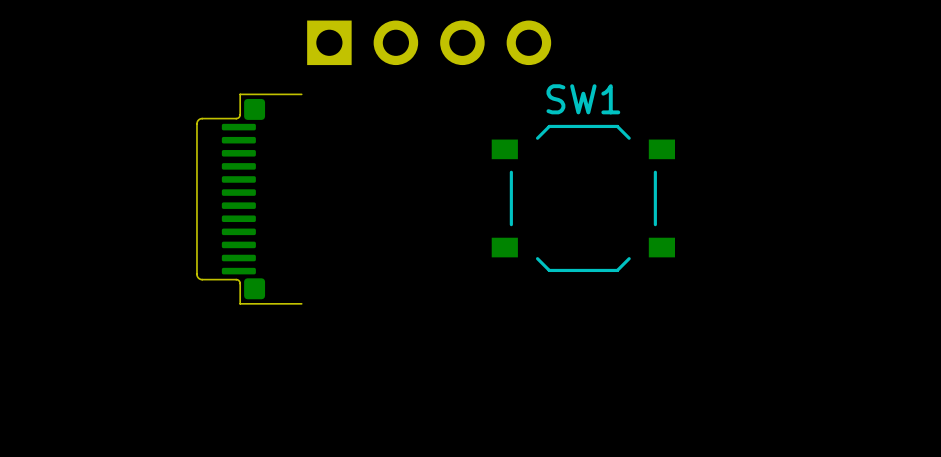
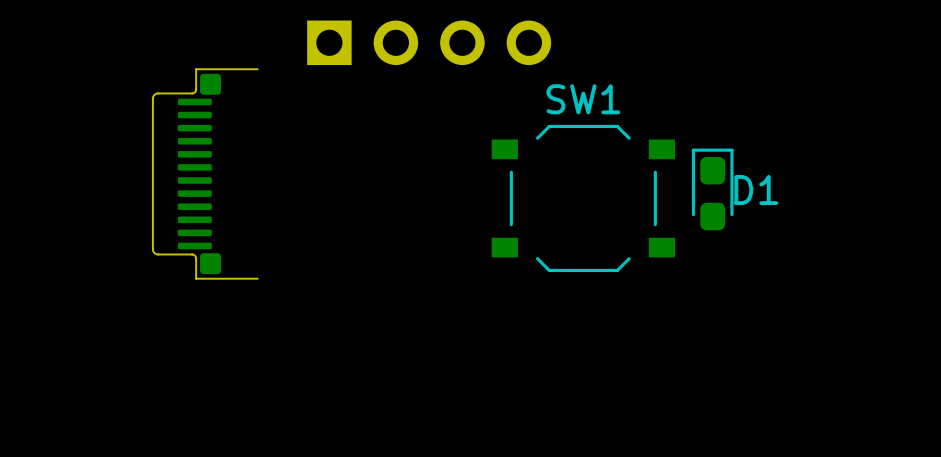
D1: none -> (712, 189)
part position: (249, 199) -> (205, 173)

